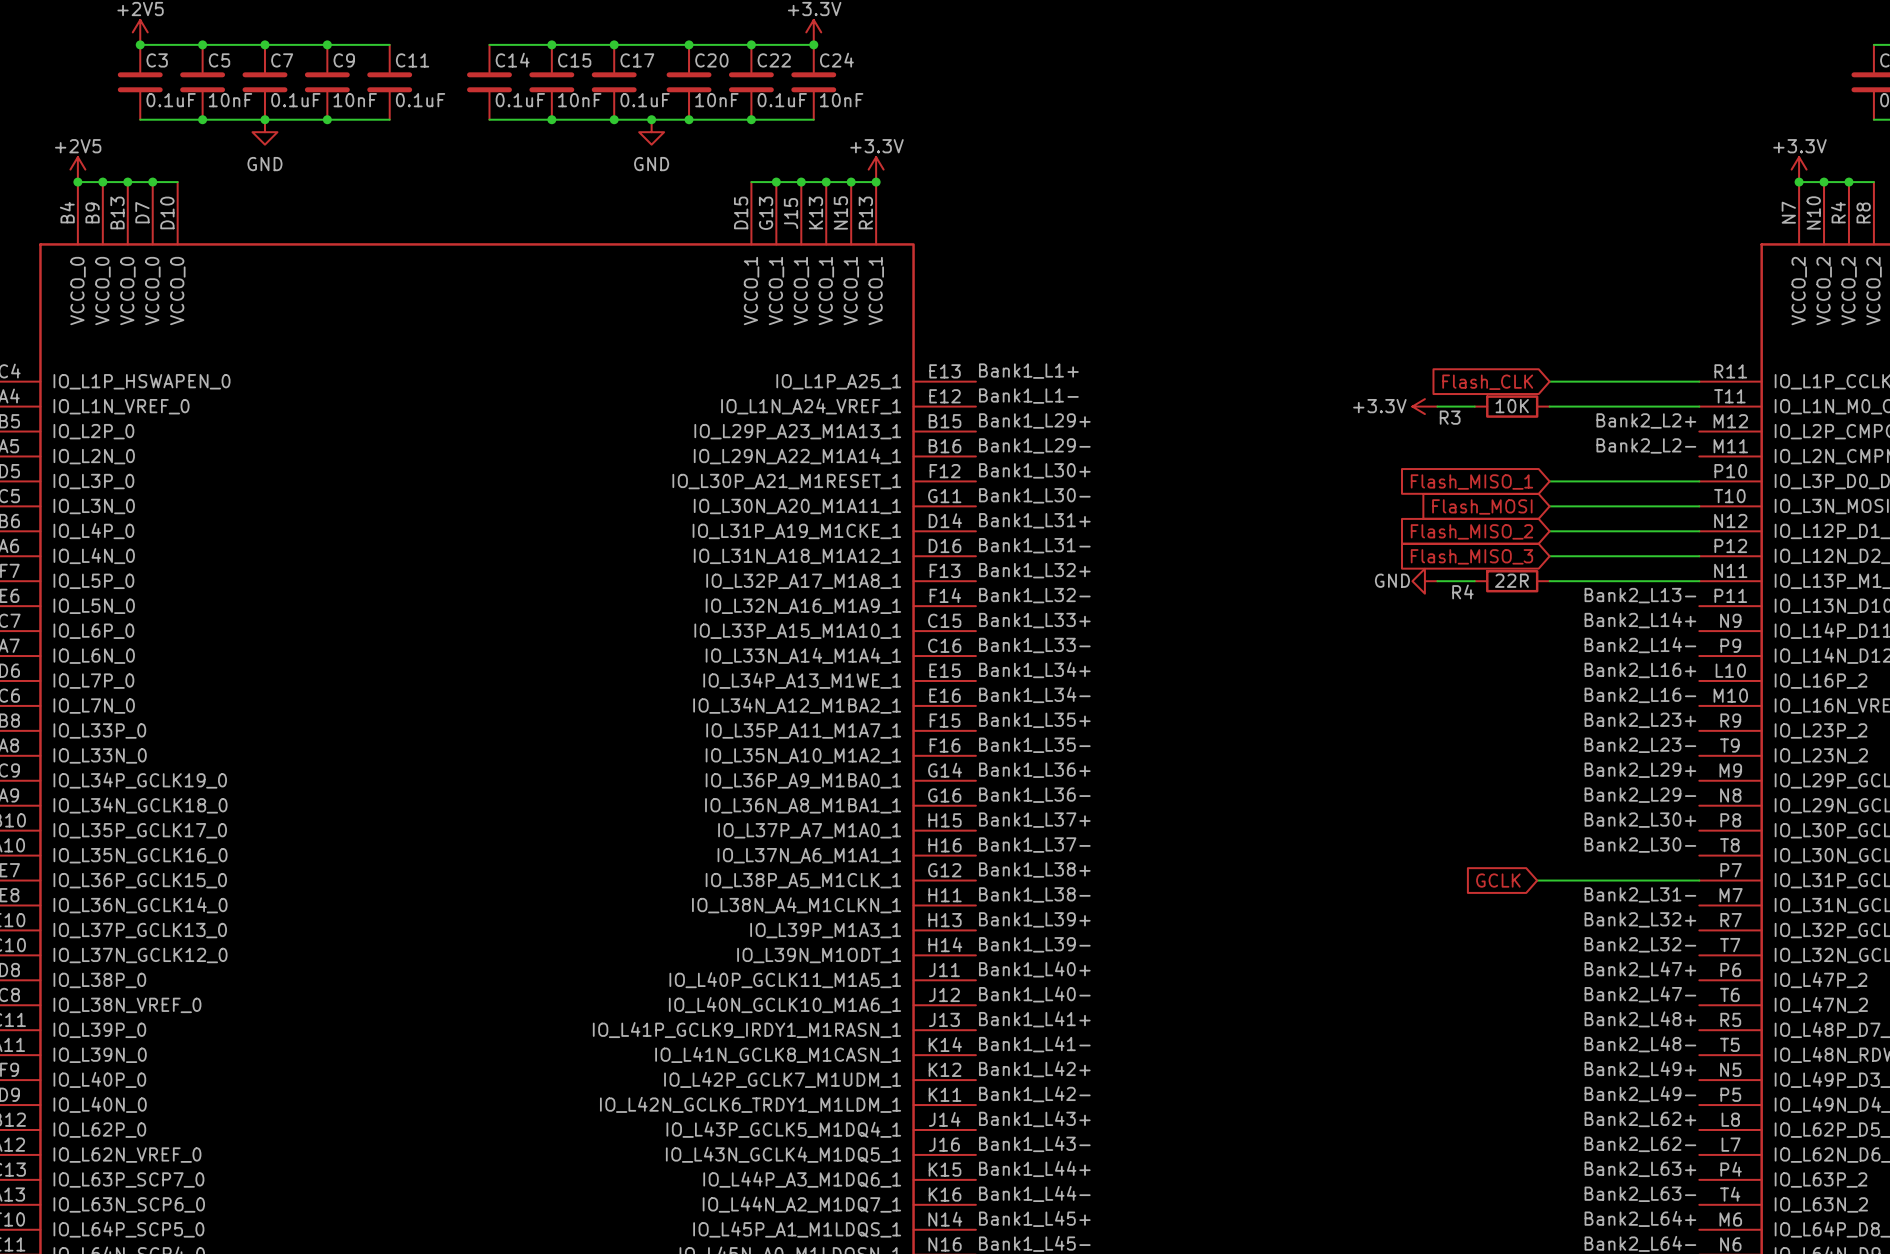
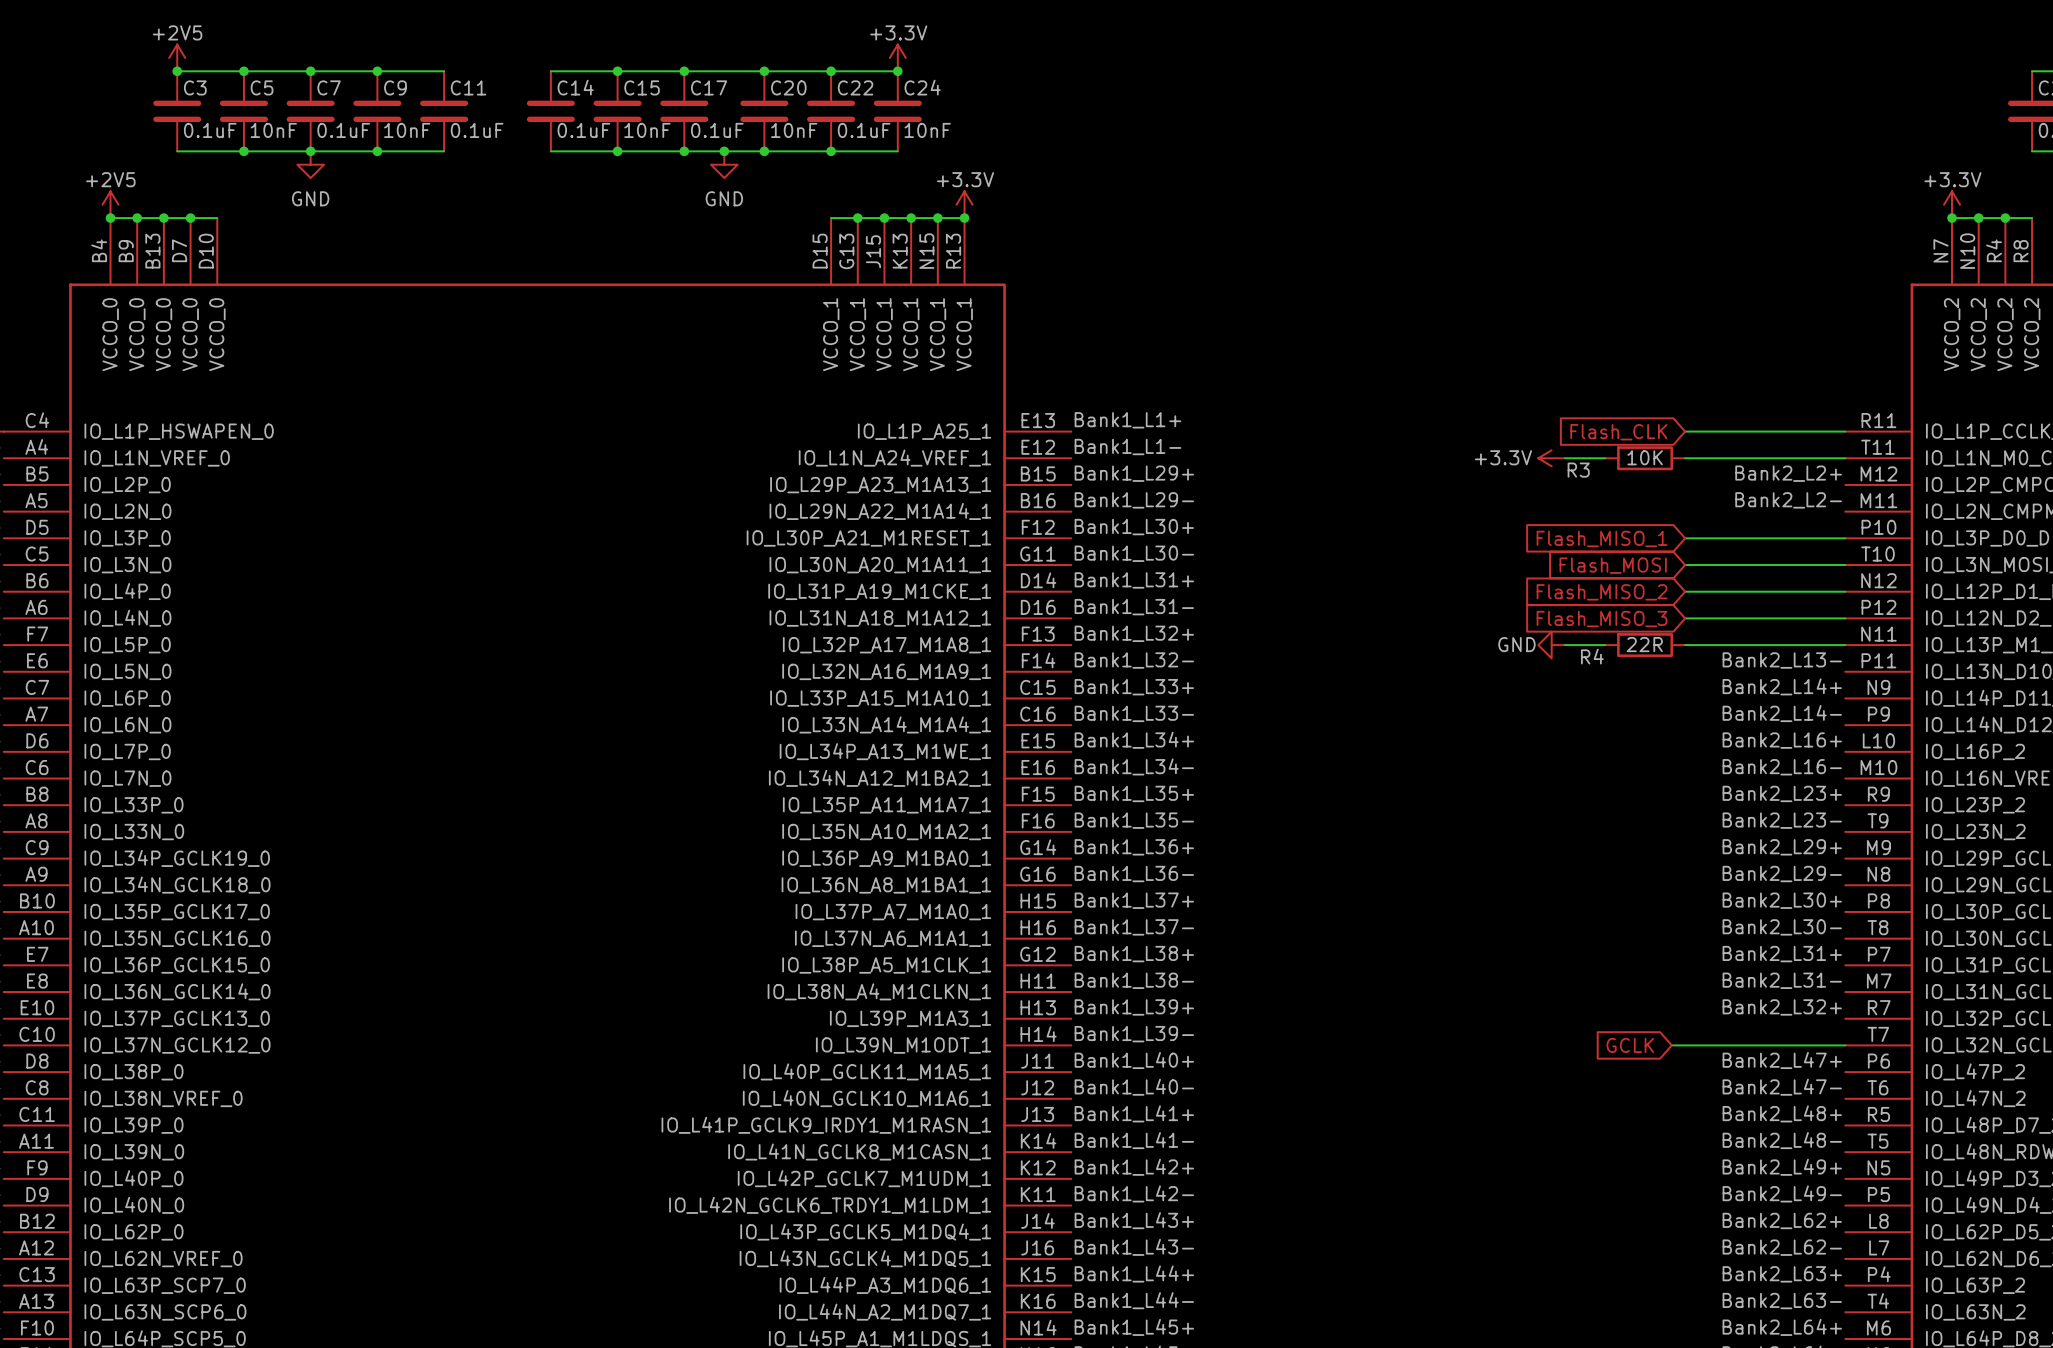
label: none -> Bank2_L31+ (1782, 954)
global label position: GCLK (1498, 880) -> GCLK (1630, 1045)
wire: (1537, 880) (1699, 880) -> (1671, 1045) (1845, 1045)
label: Bank2_L32- (1640, 944) -> none

